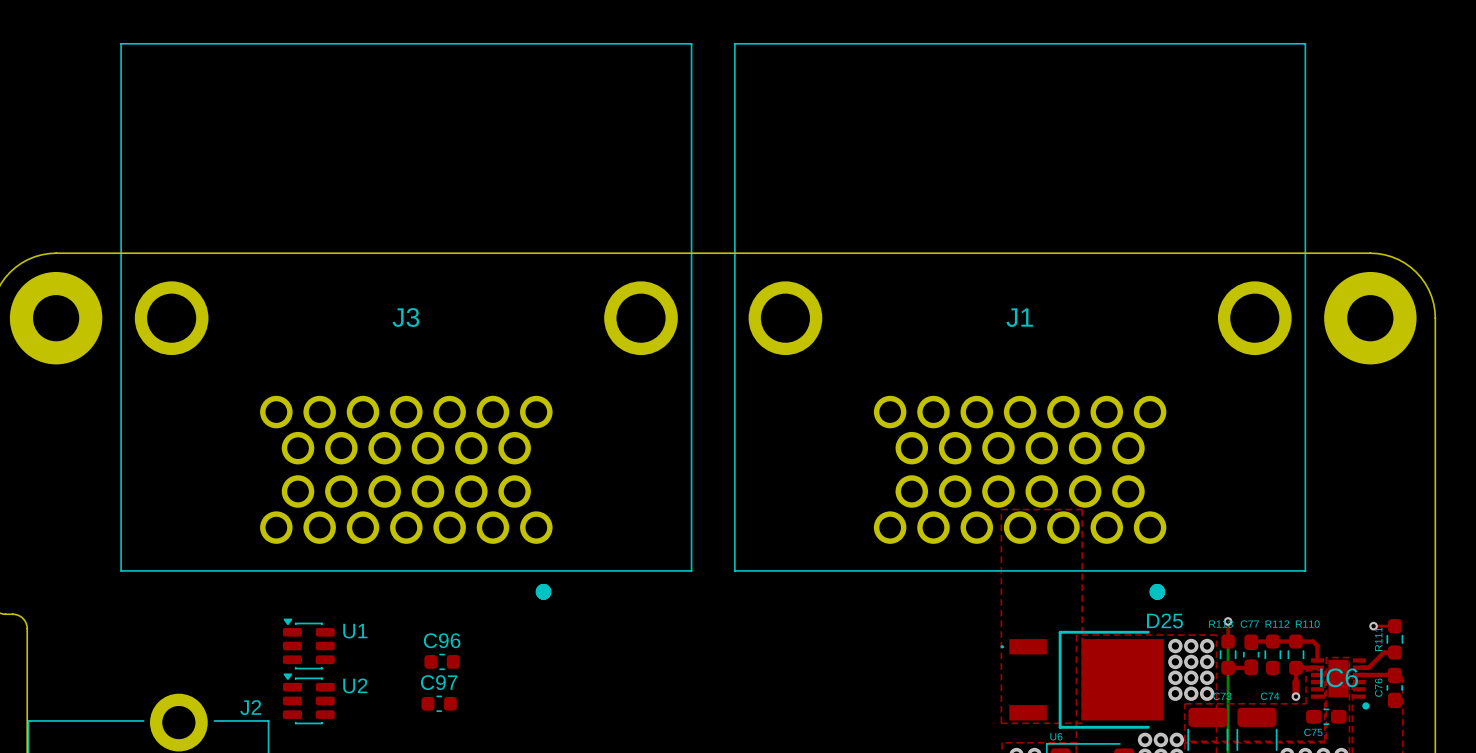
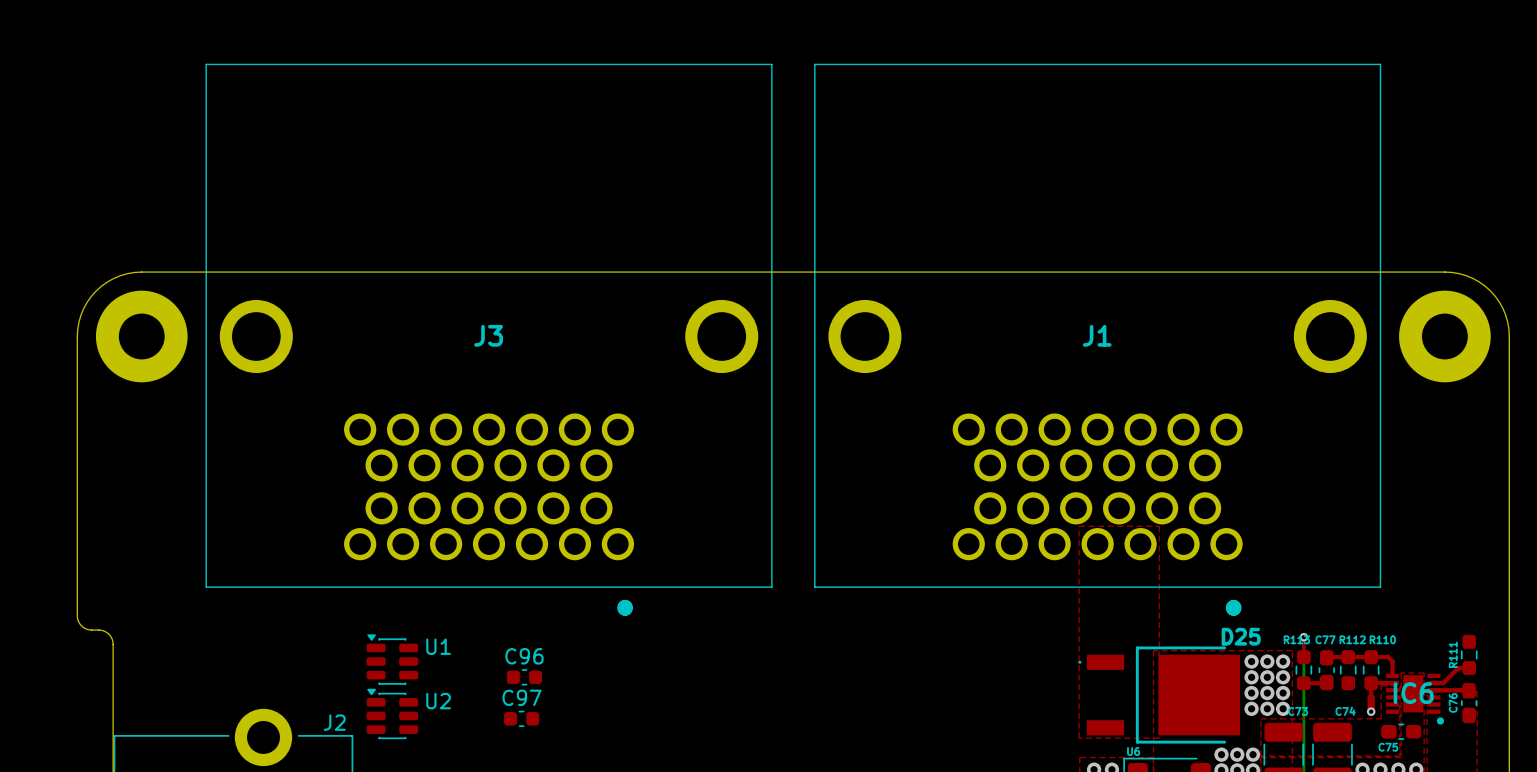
top track: (1373, 626) (1394, 626) -> none
via: (1373, 626) -> none

